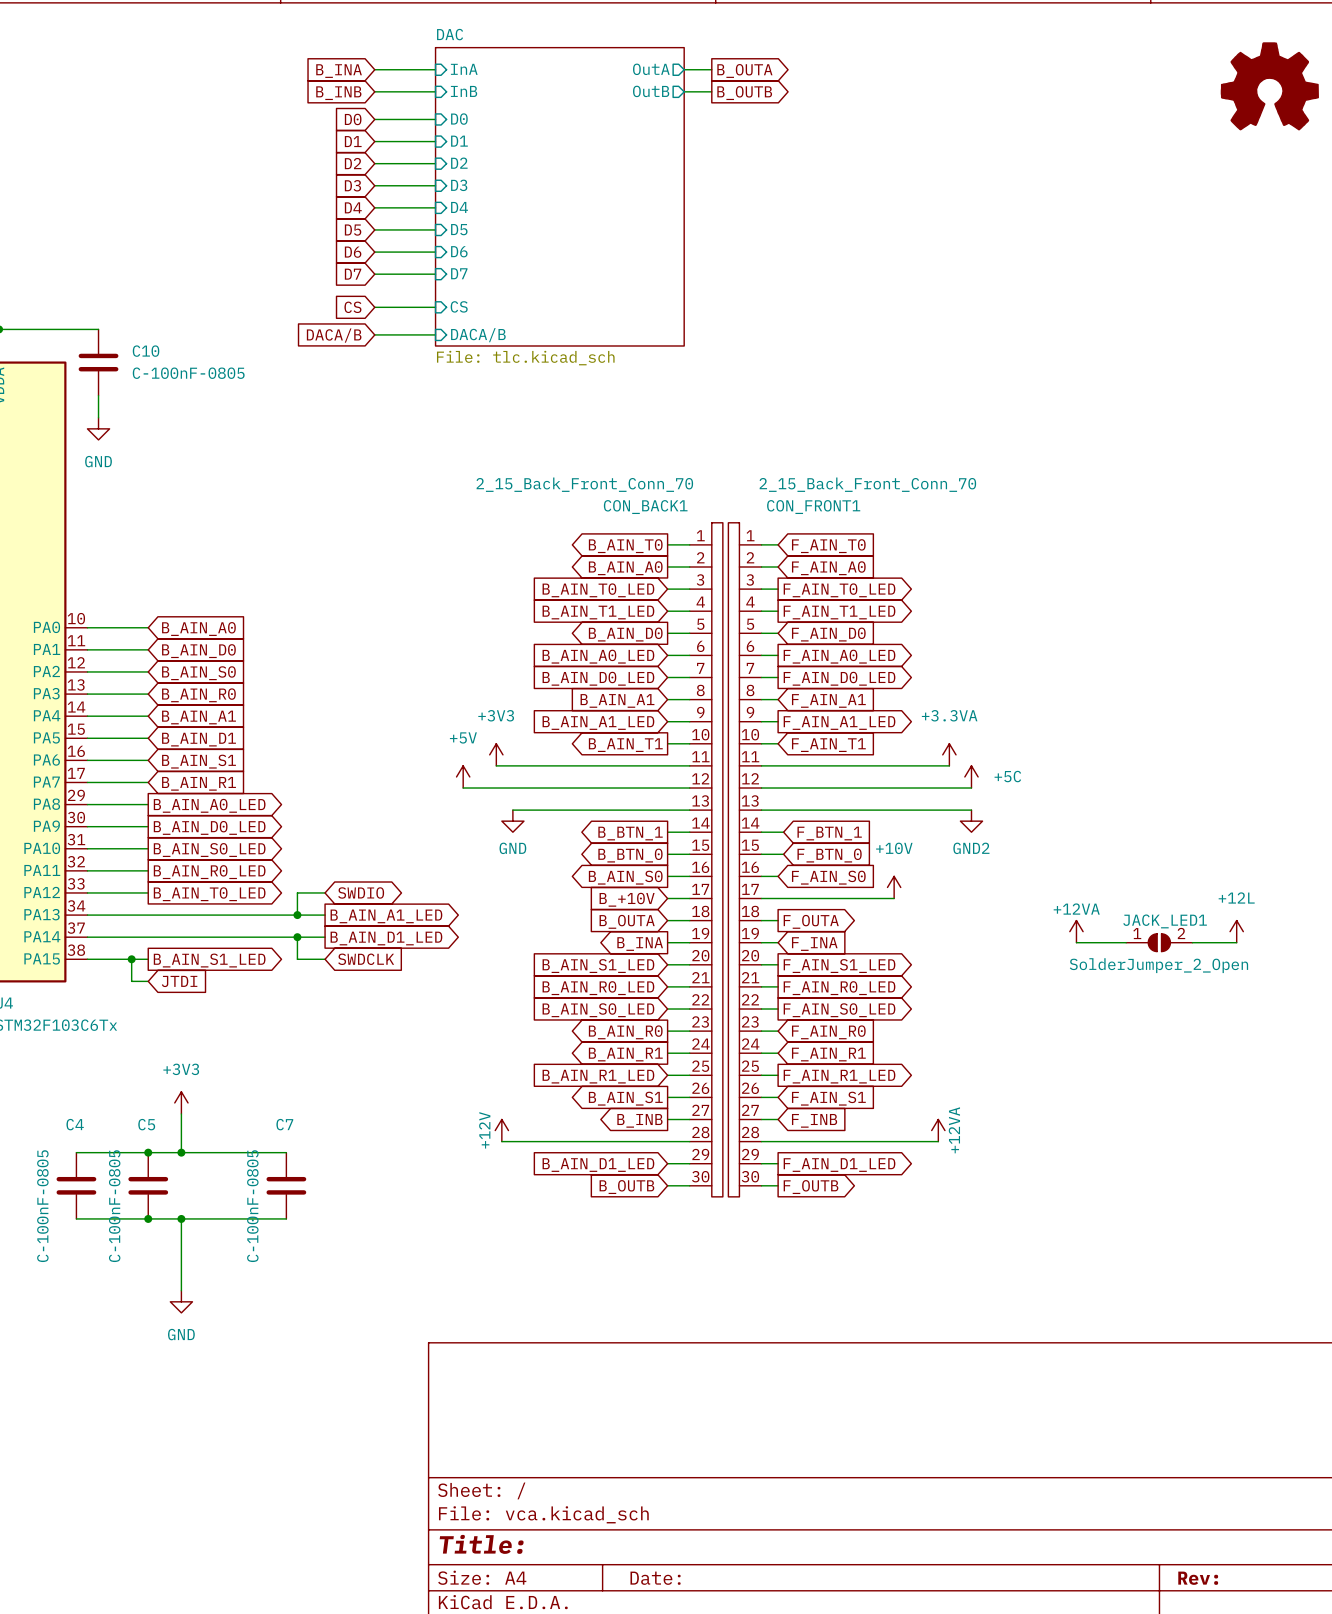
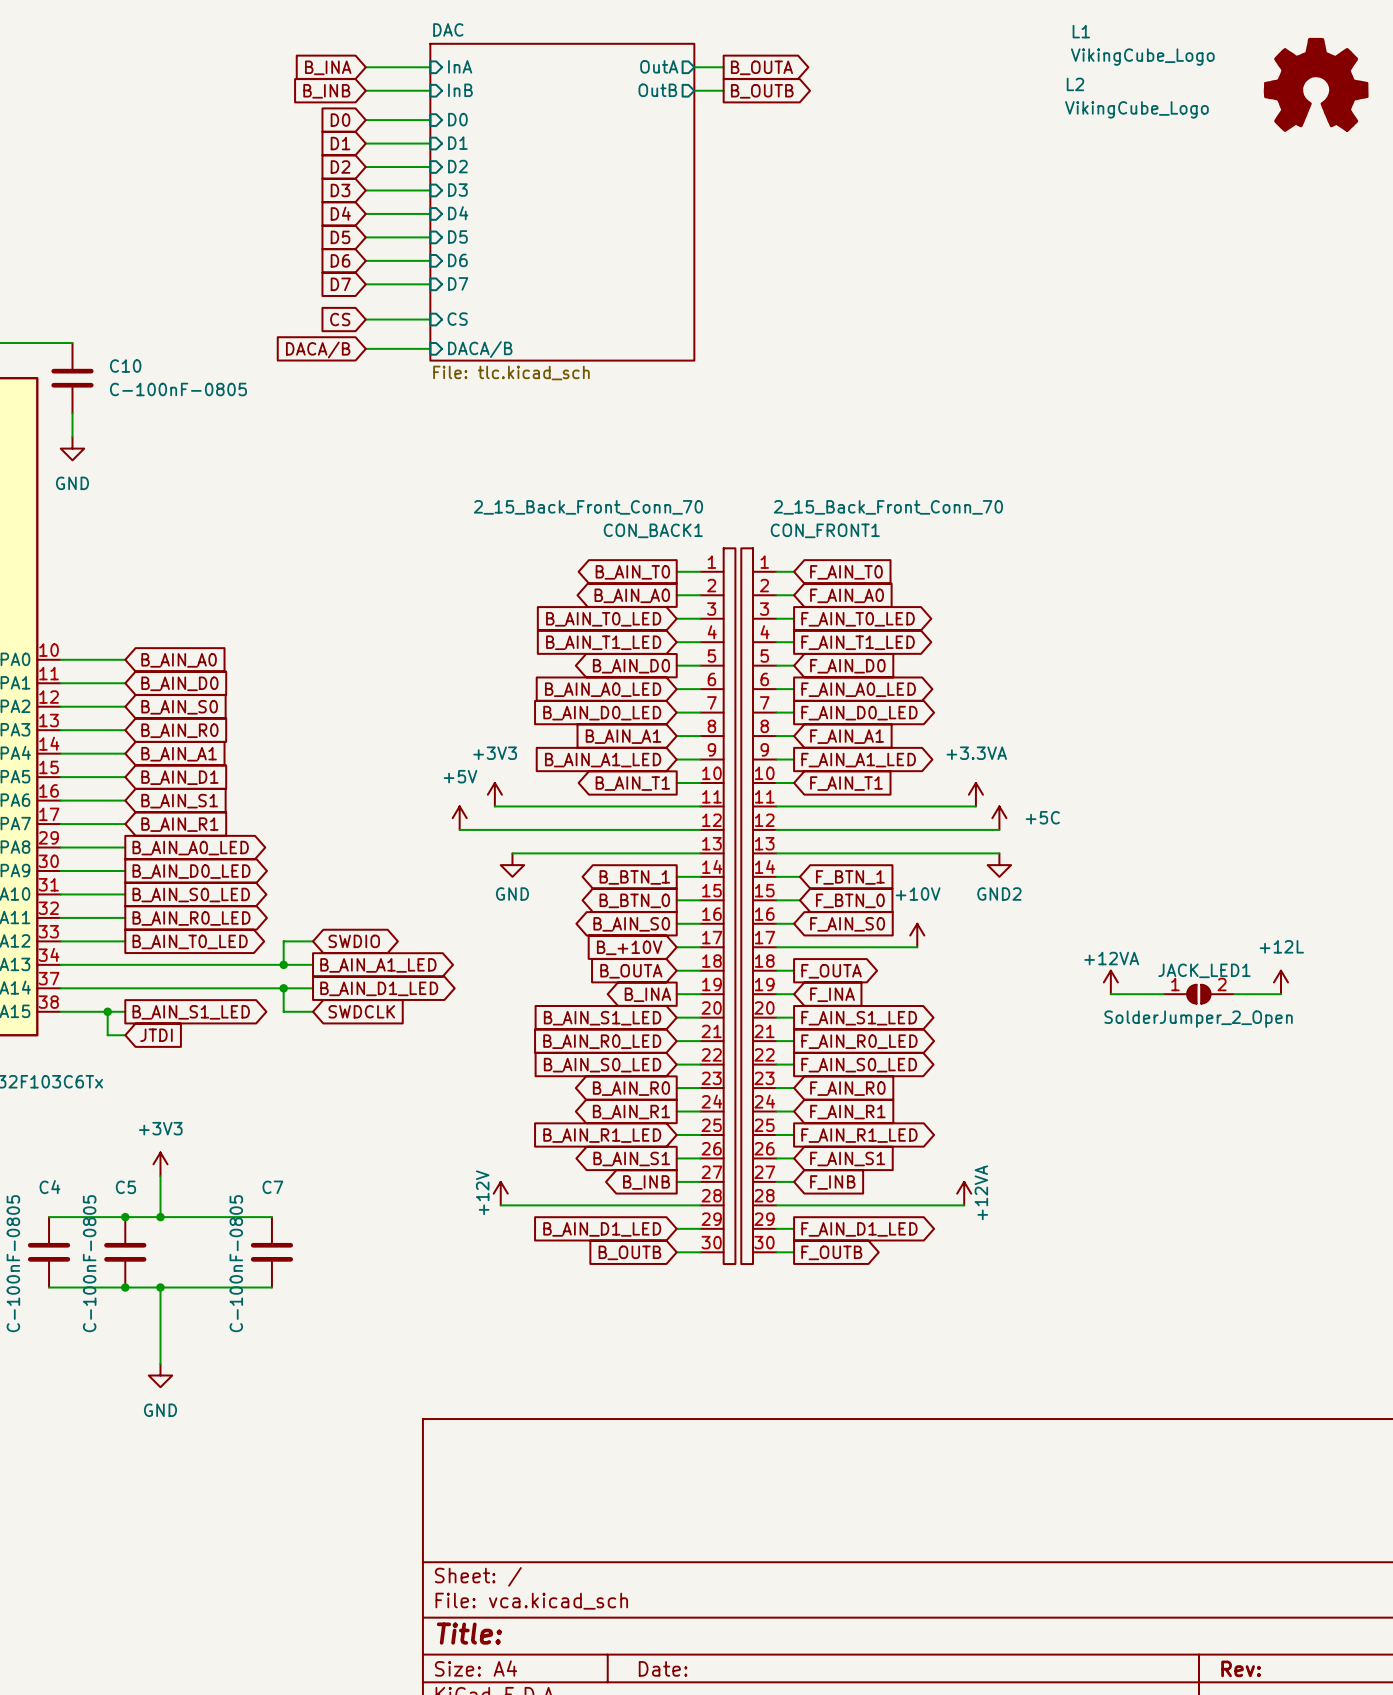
L1: none -> VikingCube_Logo (1142, 45)
L2: none -> VikingCube_Logo (1136, 98)

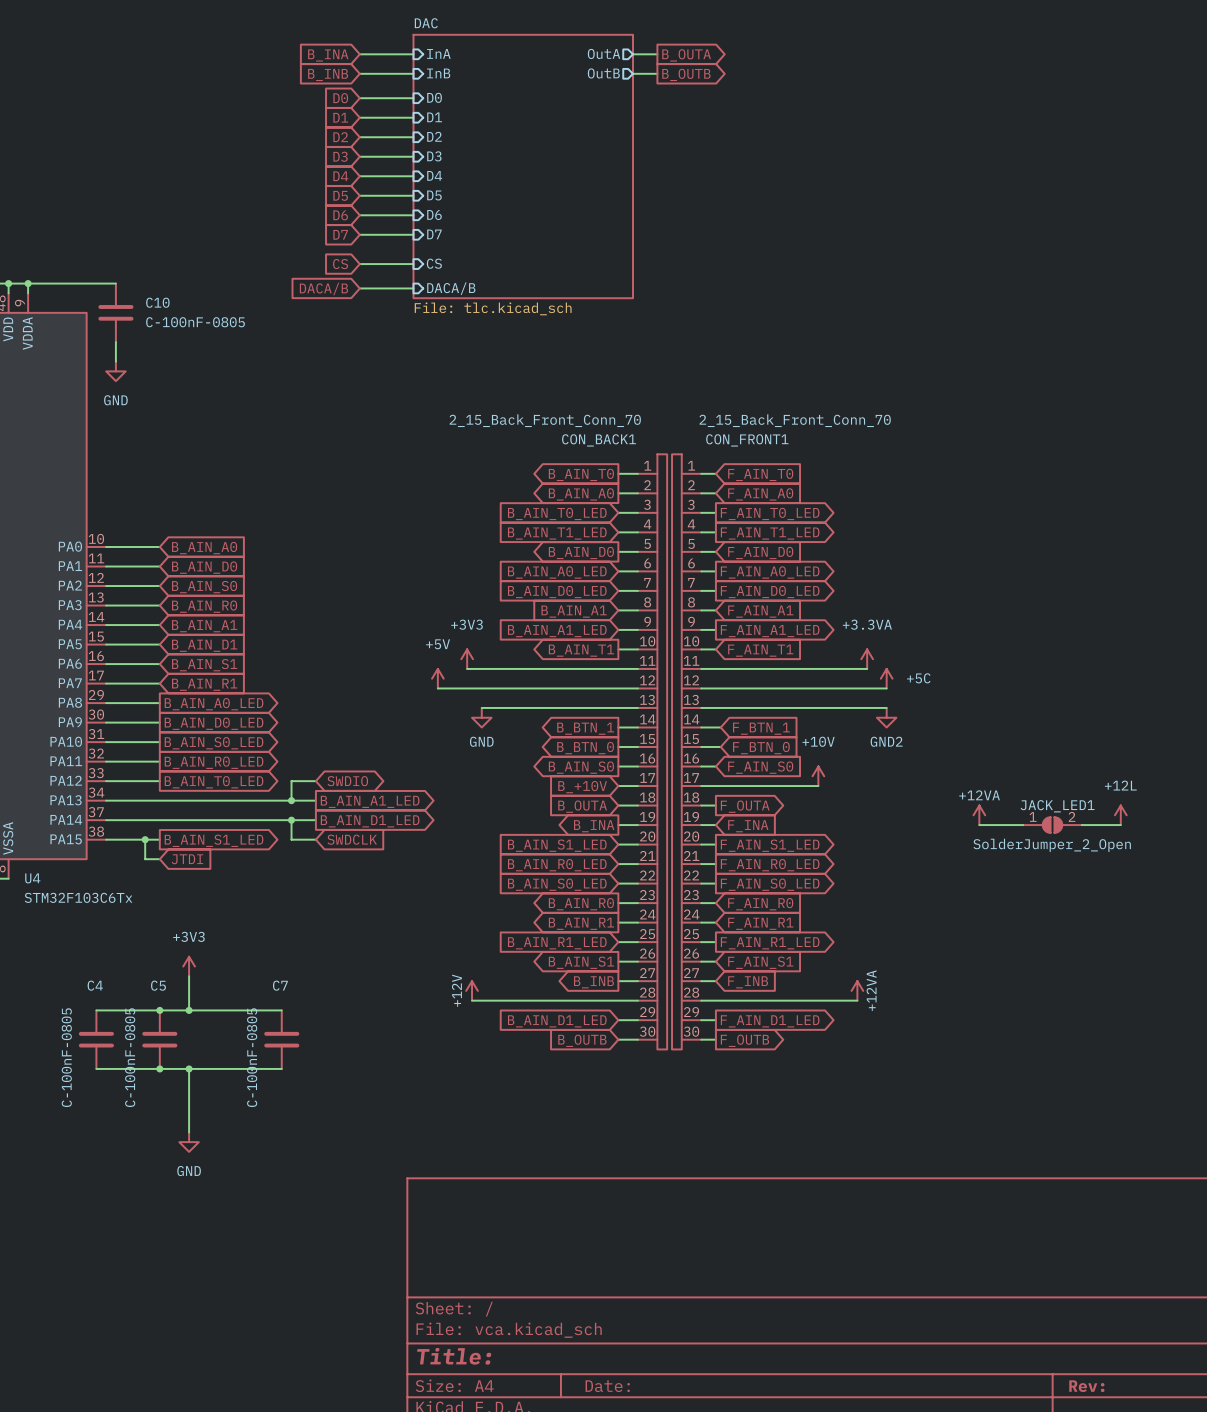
L1: VikingCube_Logo (1142, 45) -> none
power symbol: (1316, 84) -> none
L2: VikingCube_Logo (1136, 98) -> none

